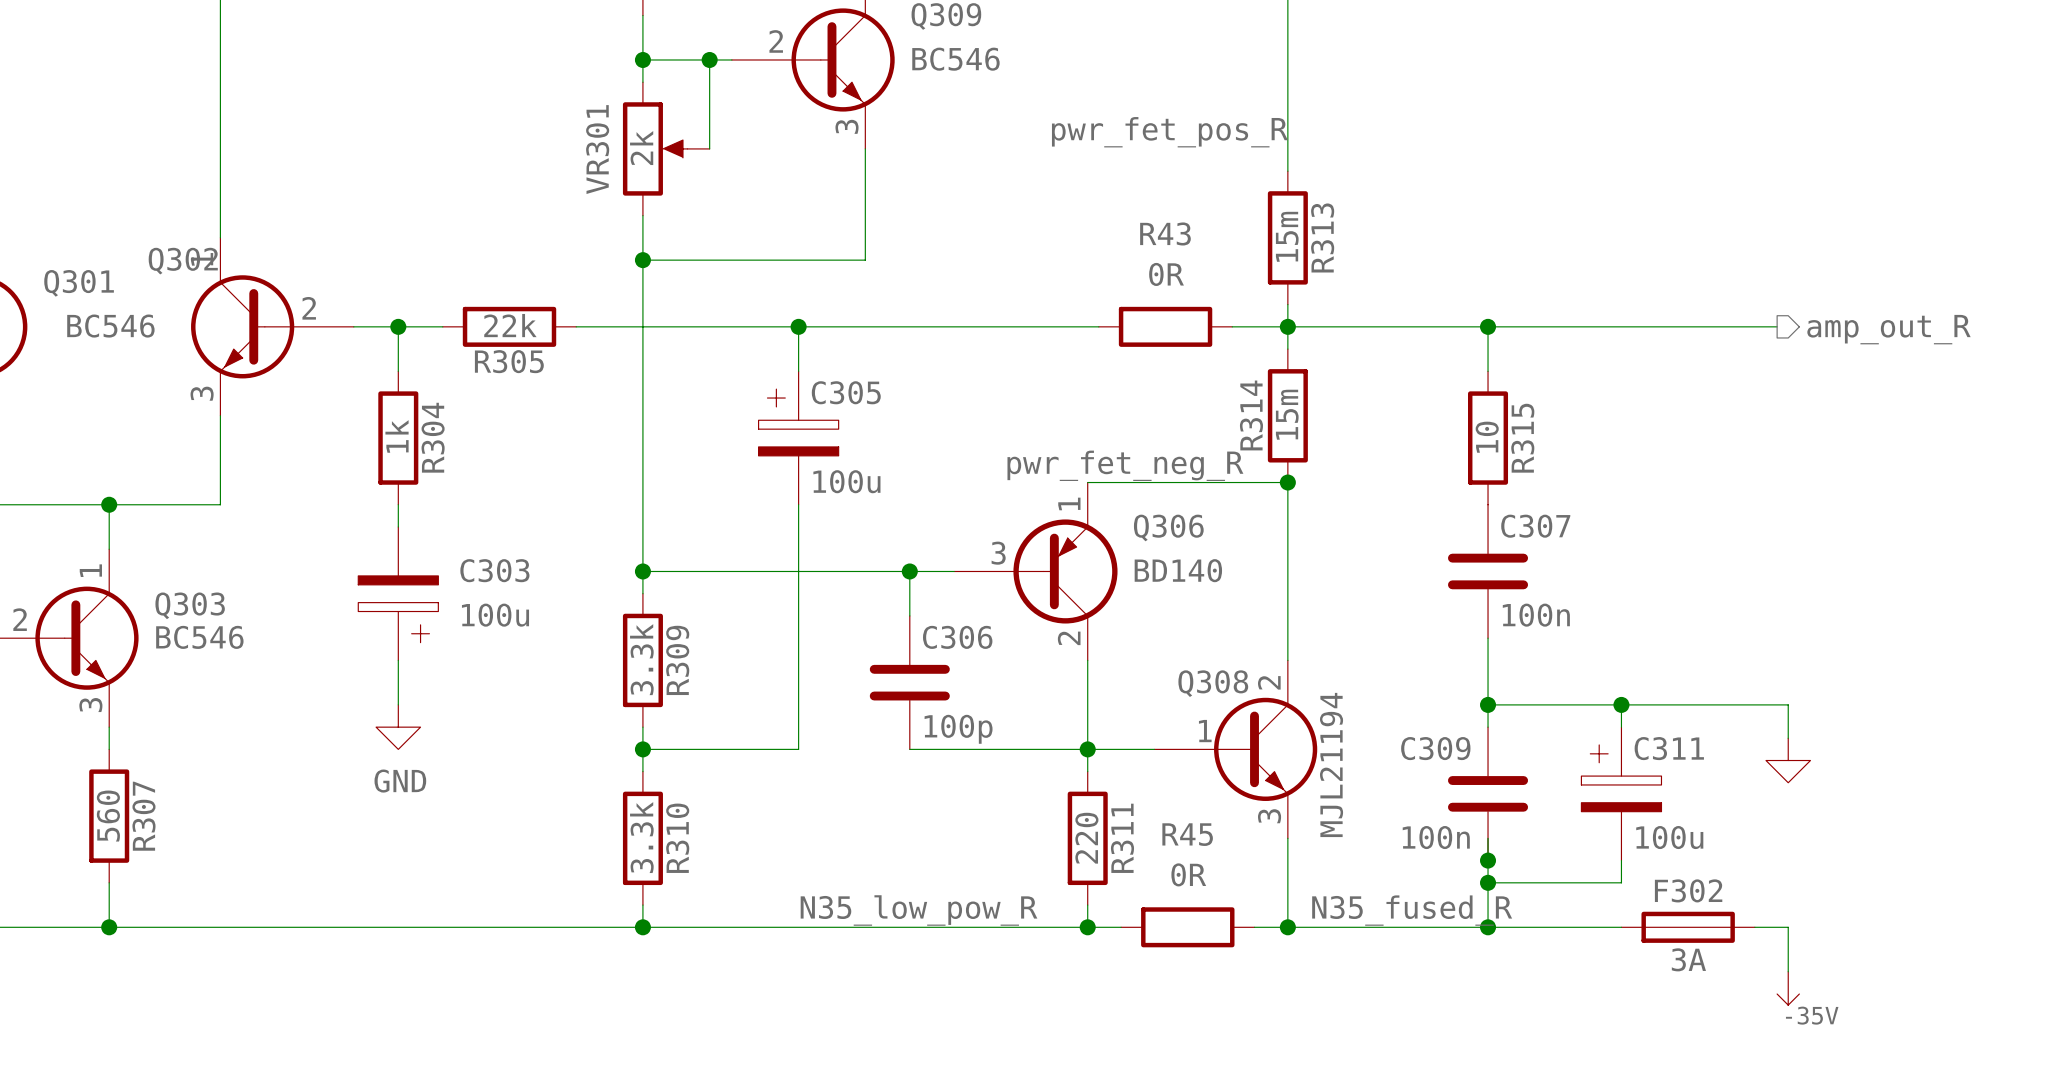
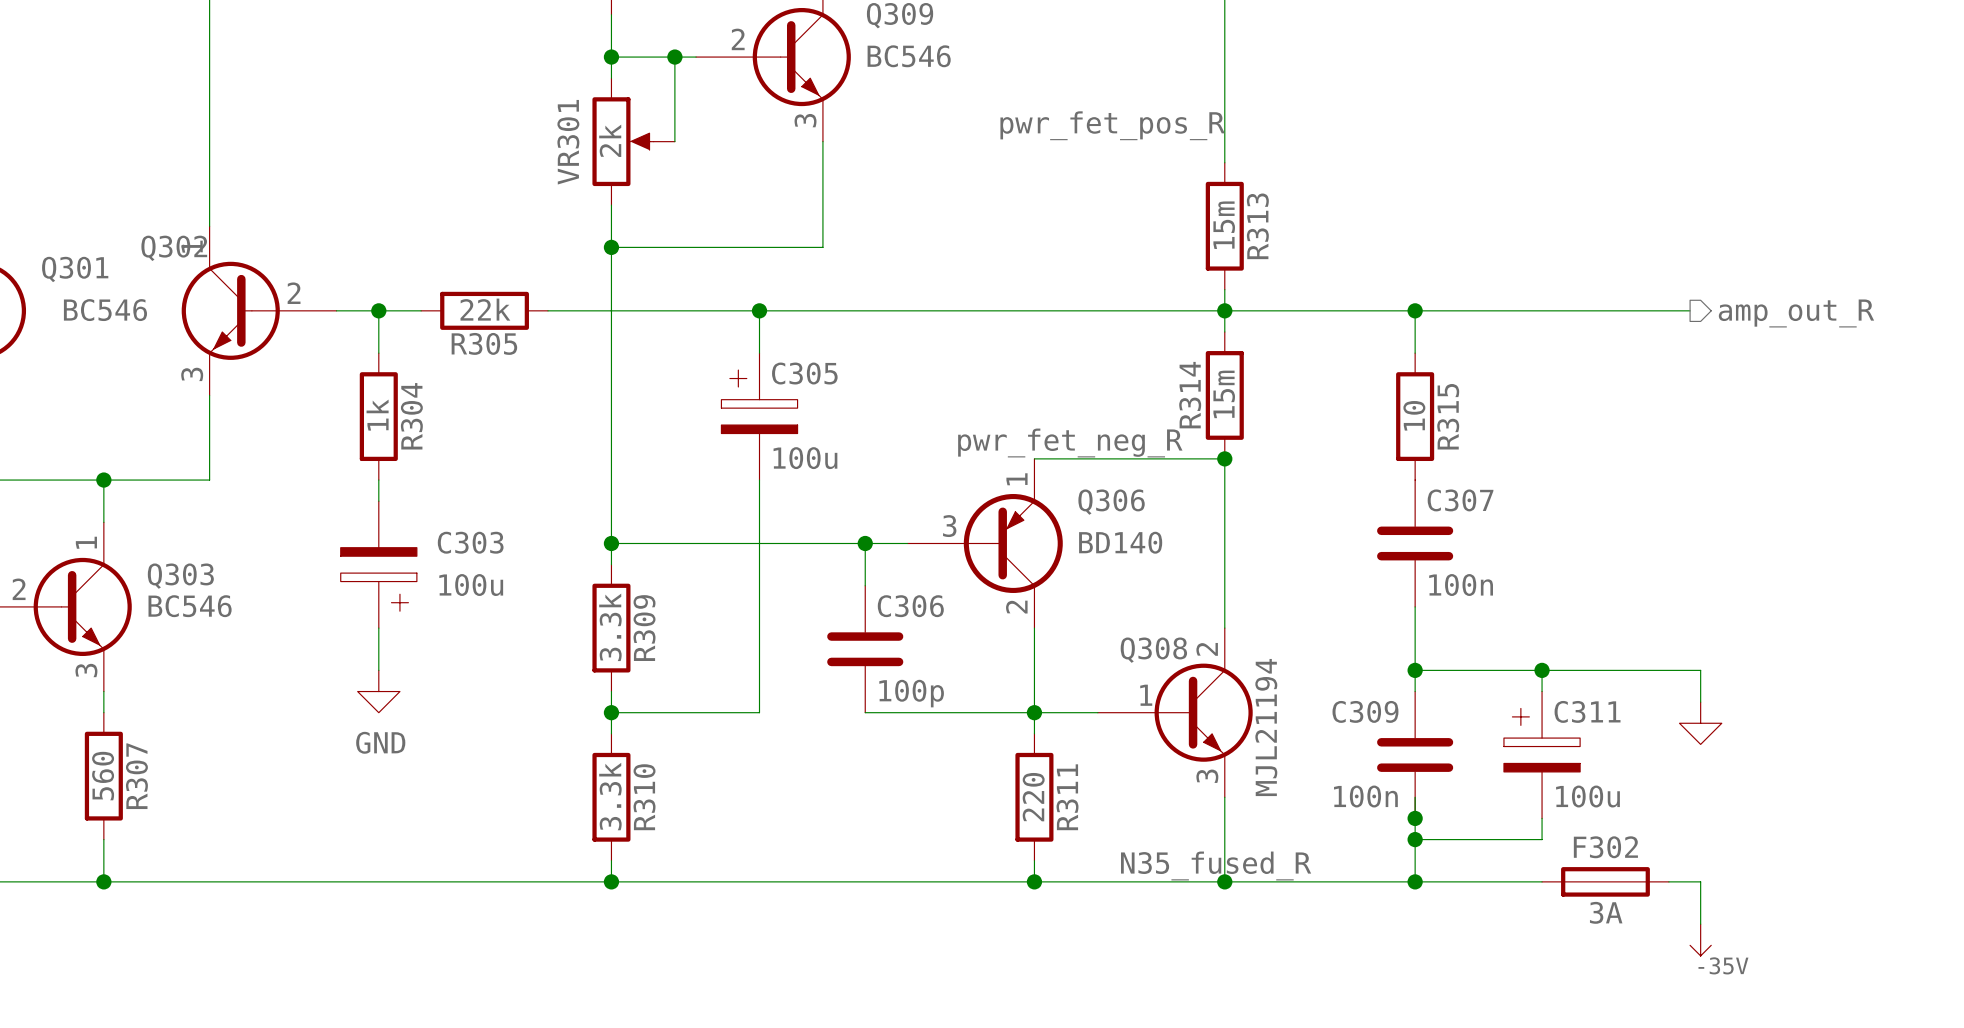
wire: none -> (1045, 310) (1171, 310)
R43: 0R (1165, 326) -> none
label: N35_low_pow_R (919, 910) -> none
label position: N35_fused_R (1412, 910) -> N35_fused_R (1216, 865)
wire: none -> (1066, 881) (1193, 881)
R45: 0R (1187, 927) -> none

